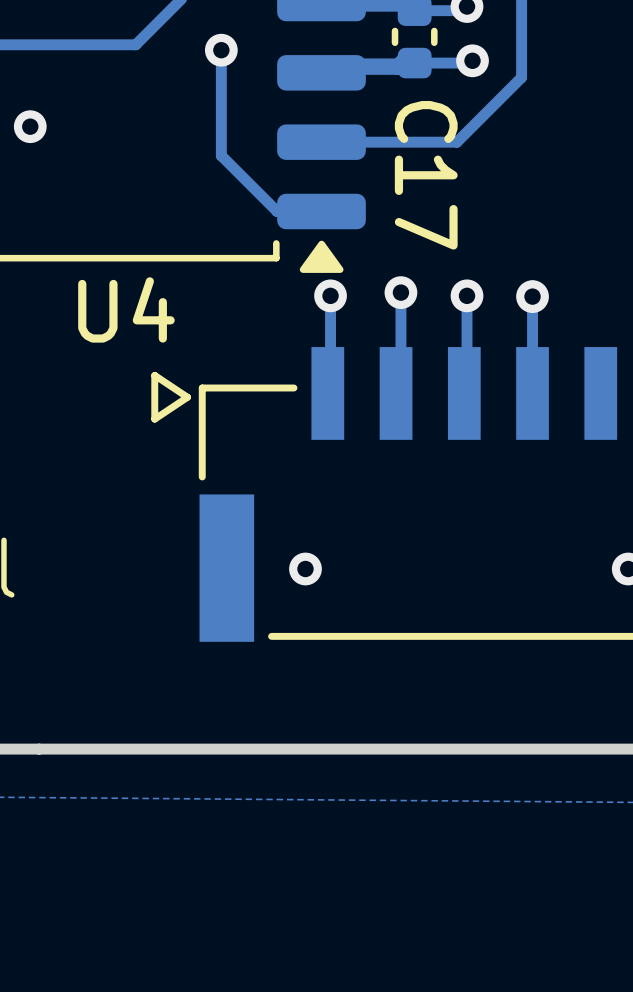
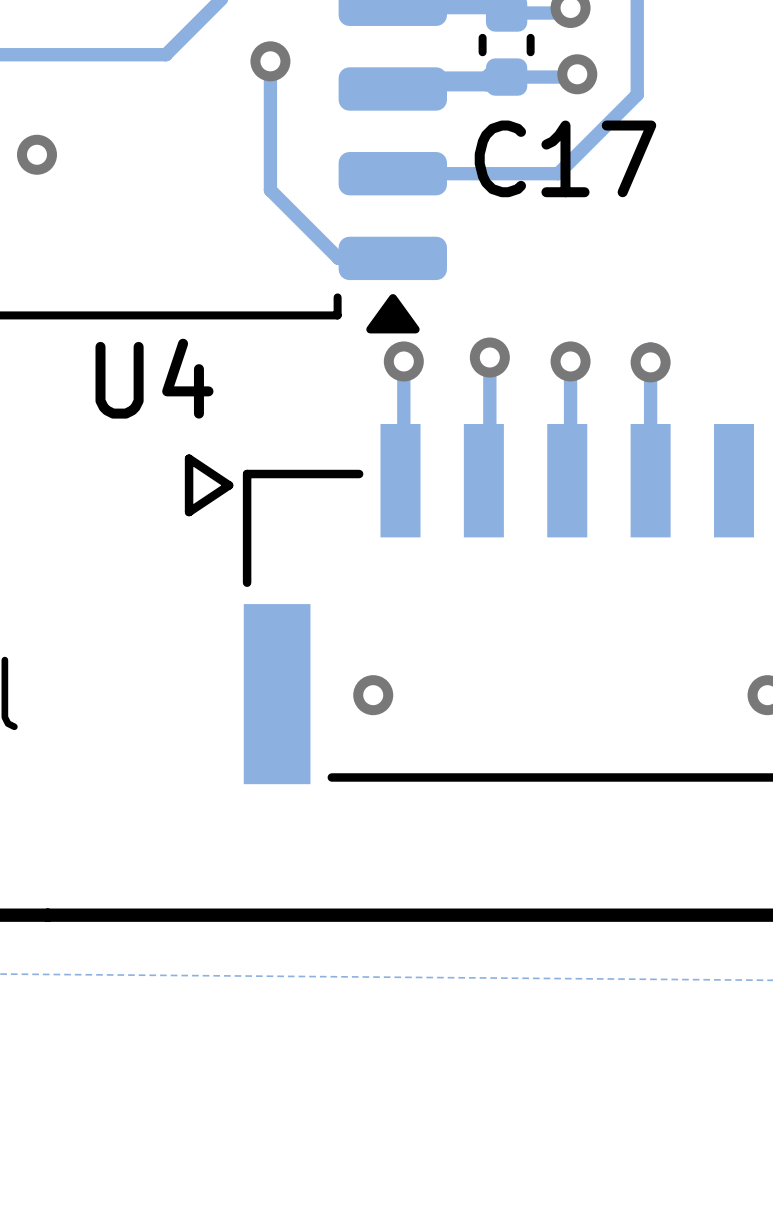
C17 name rotation: 0° (426, 175) -> 90° counterclockwise (565, 158)

